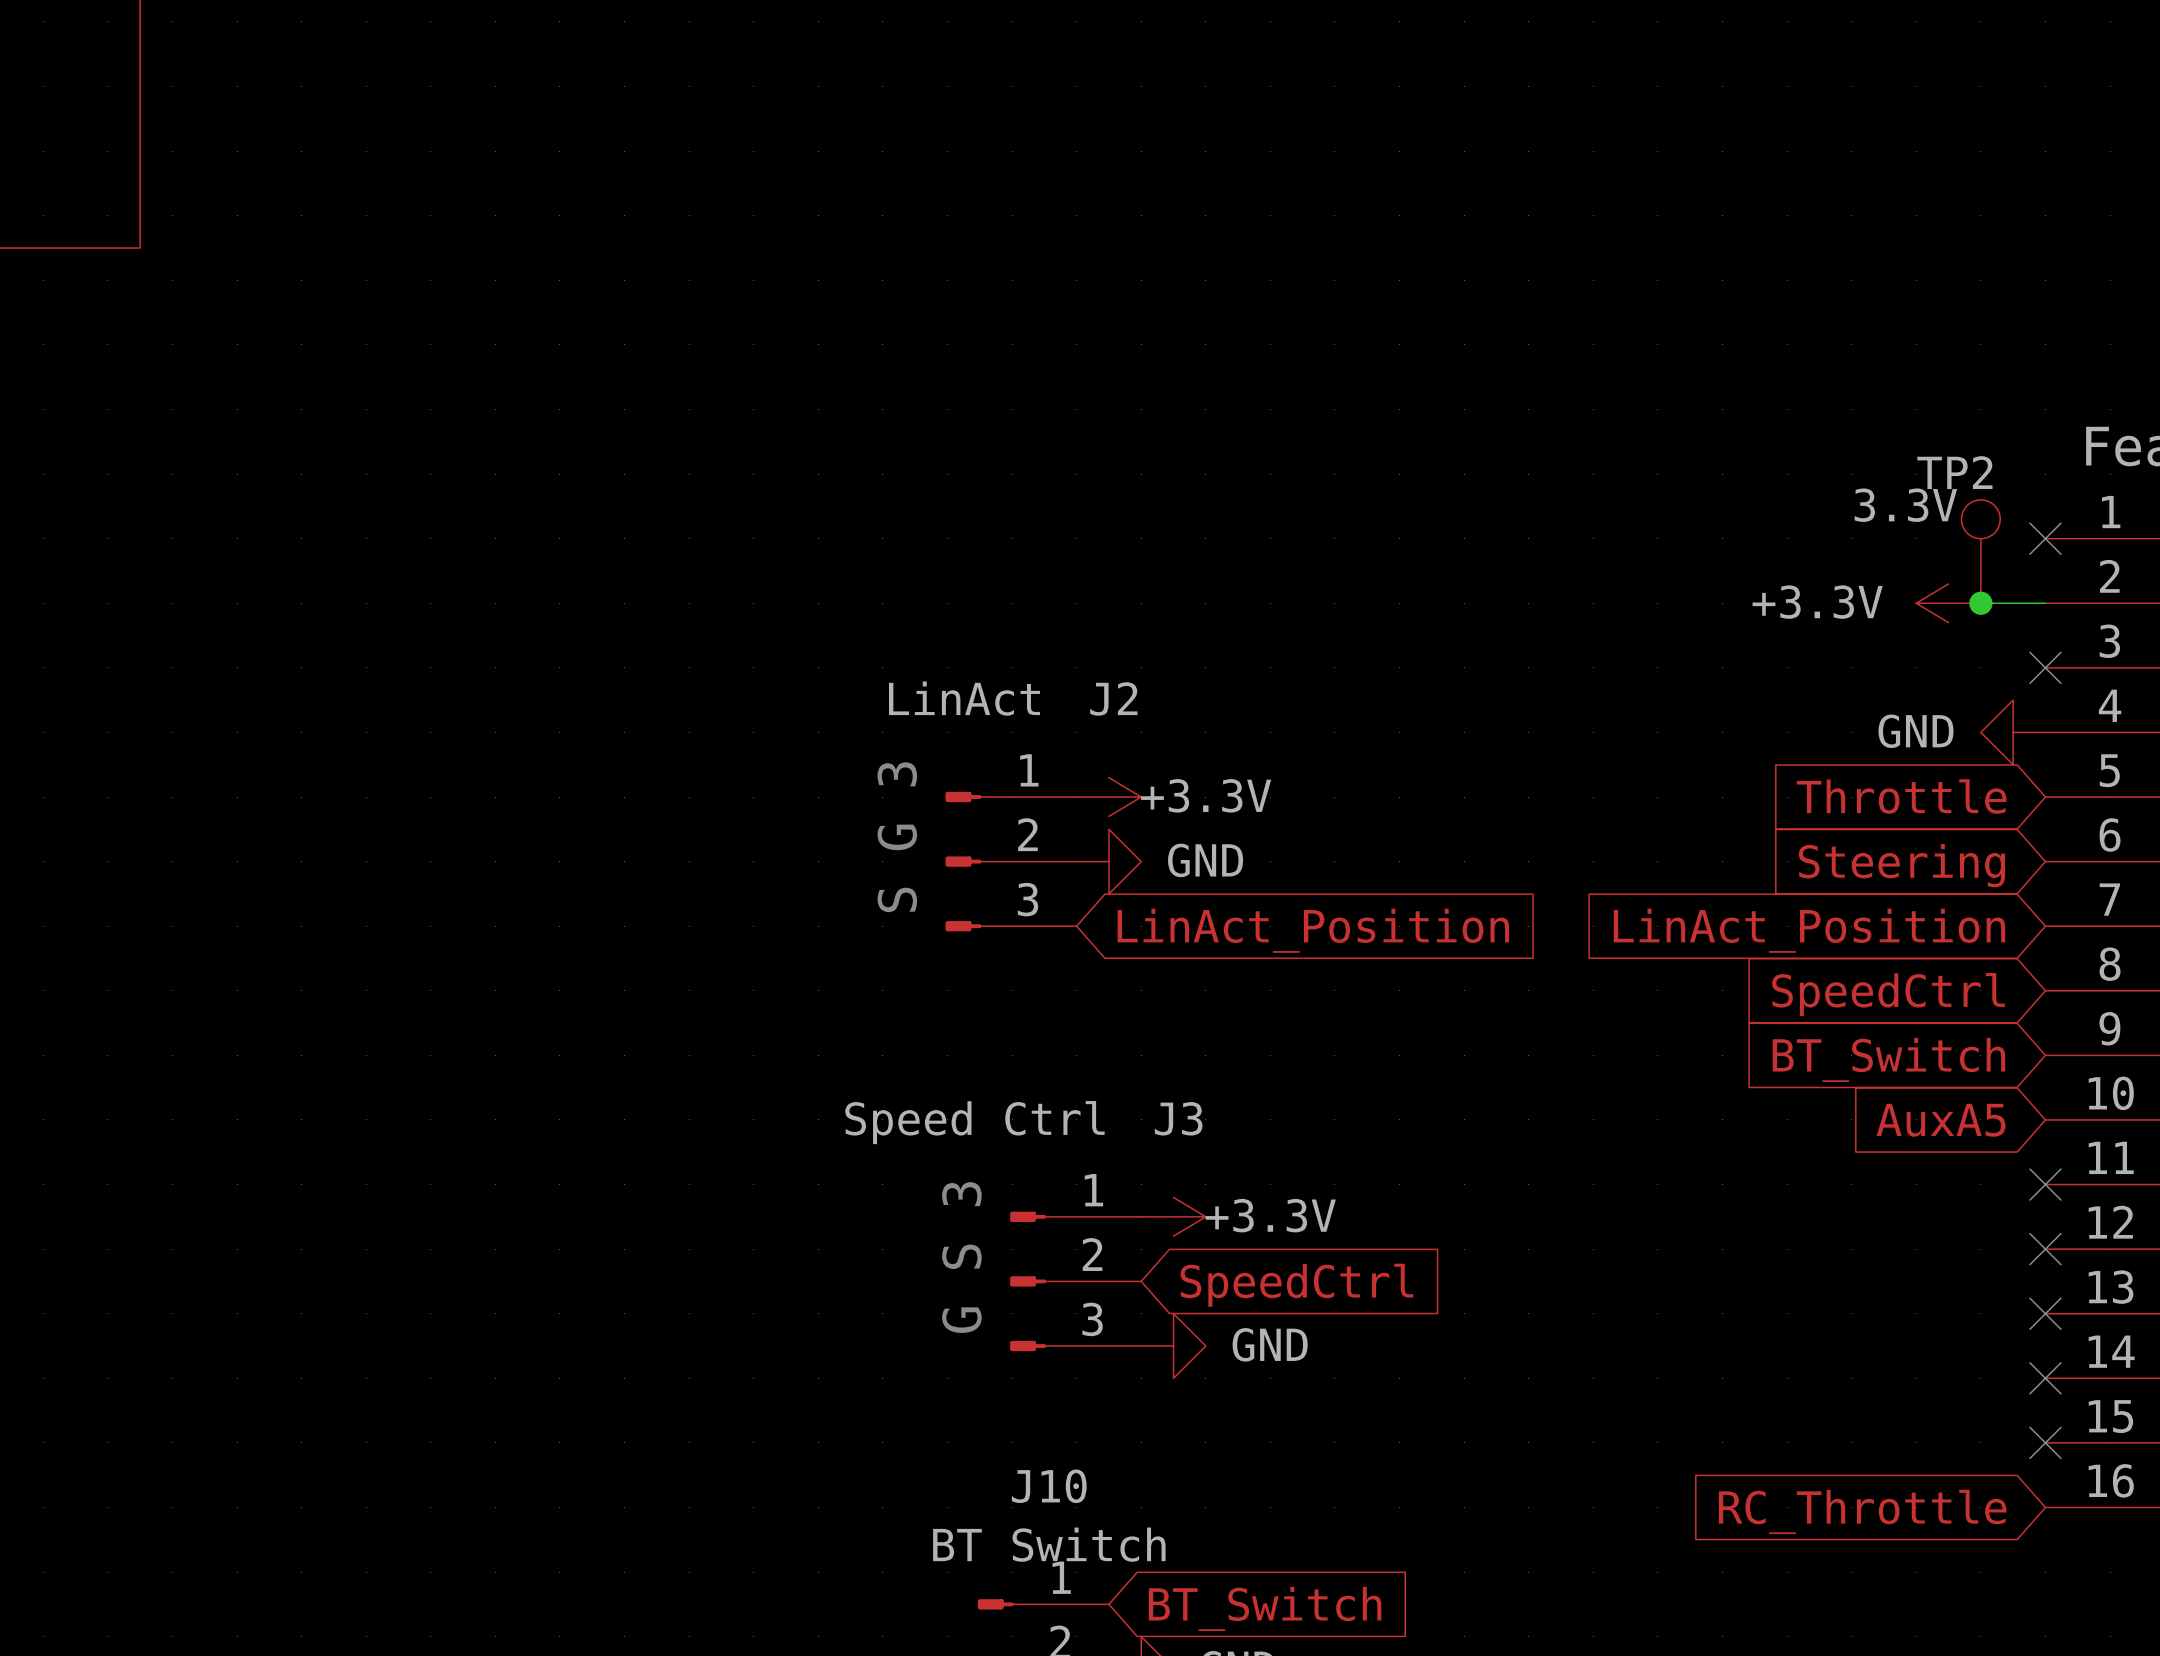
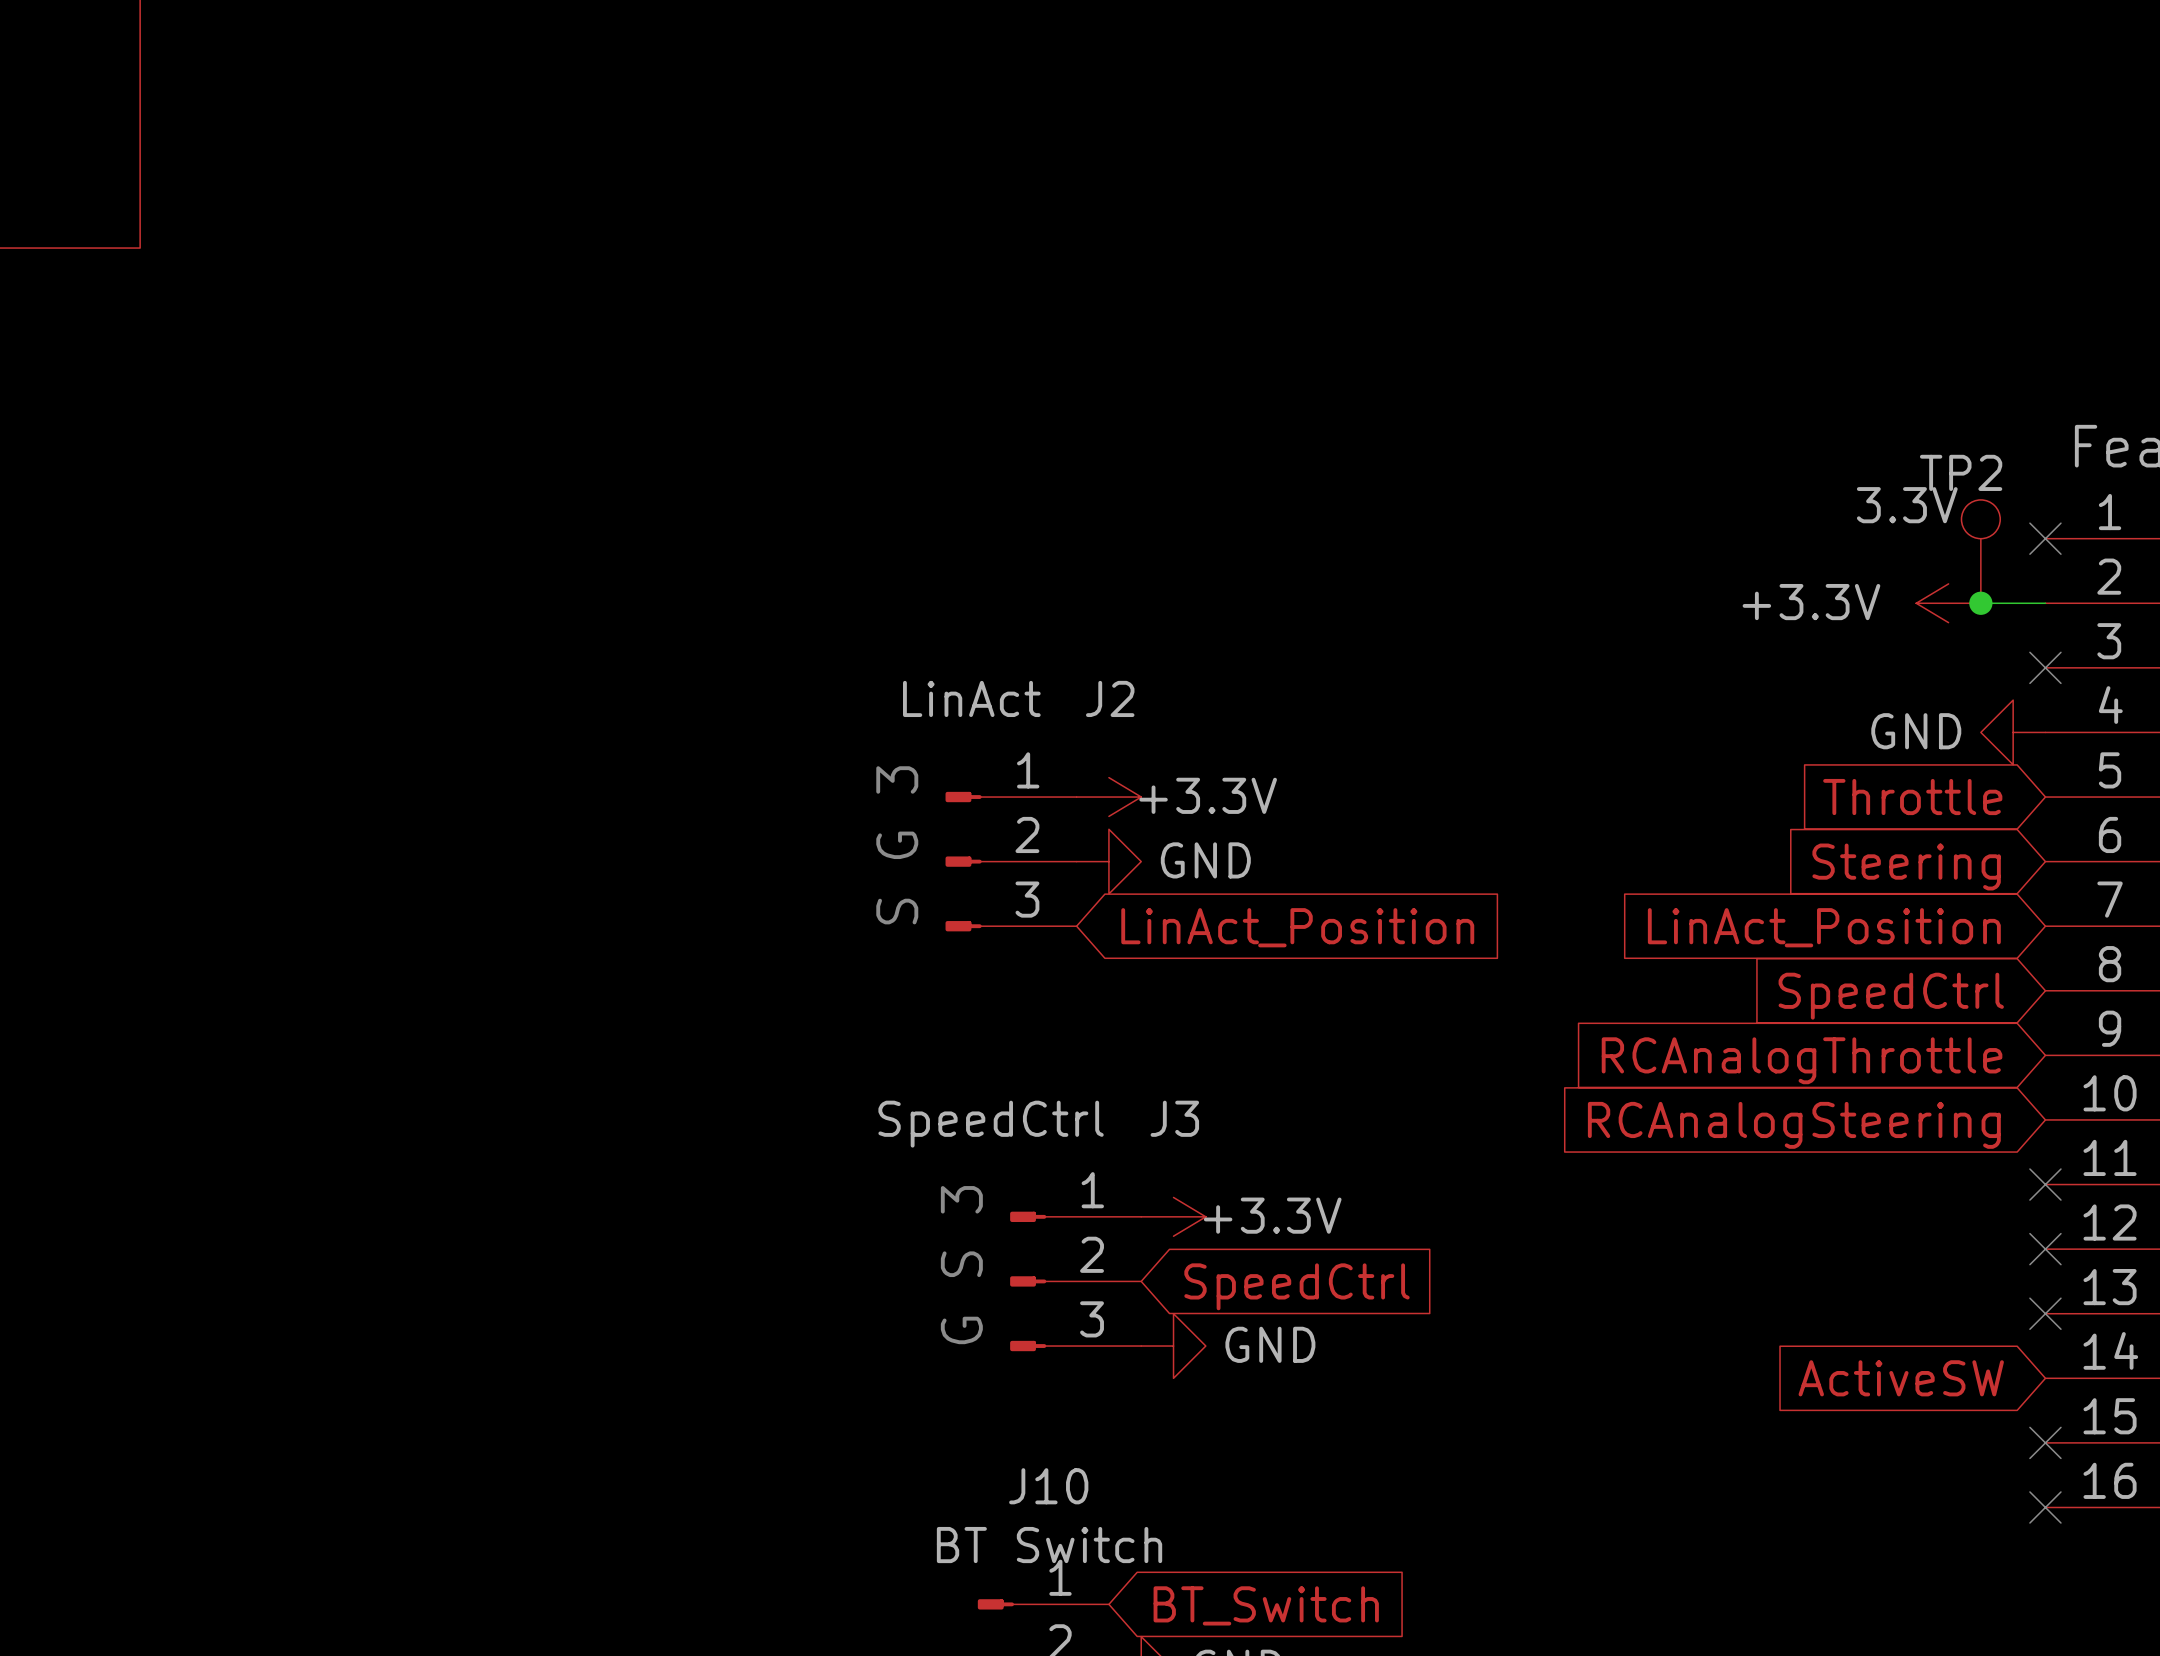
global label: BT_Switch (1888, 1059) -> RCAnalogThrottle (1802, 1060)
global label: AuxA5 (1941, 1120) -> RCAnalogSteering (1794, 1125)
J3 value: Speed Ctrl (974, 1122) -> SpeedCtrl (991, 1124)
global label: none -> ActiveSW (1901, 1378)
no-connect mark position: (2045, 1378) -> (2045, 1507)
global label: RC_Throttle (1862, 1511) -> none

